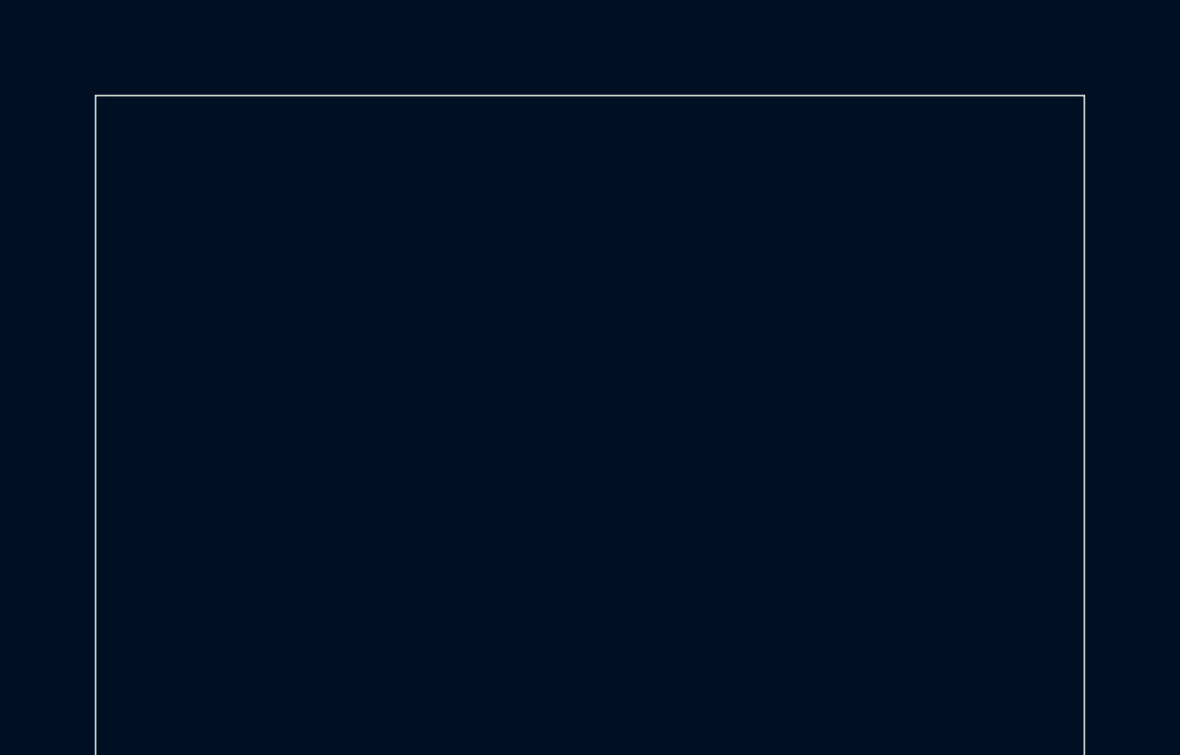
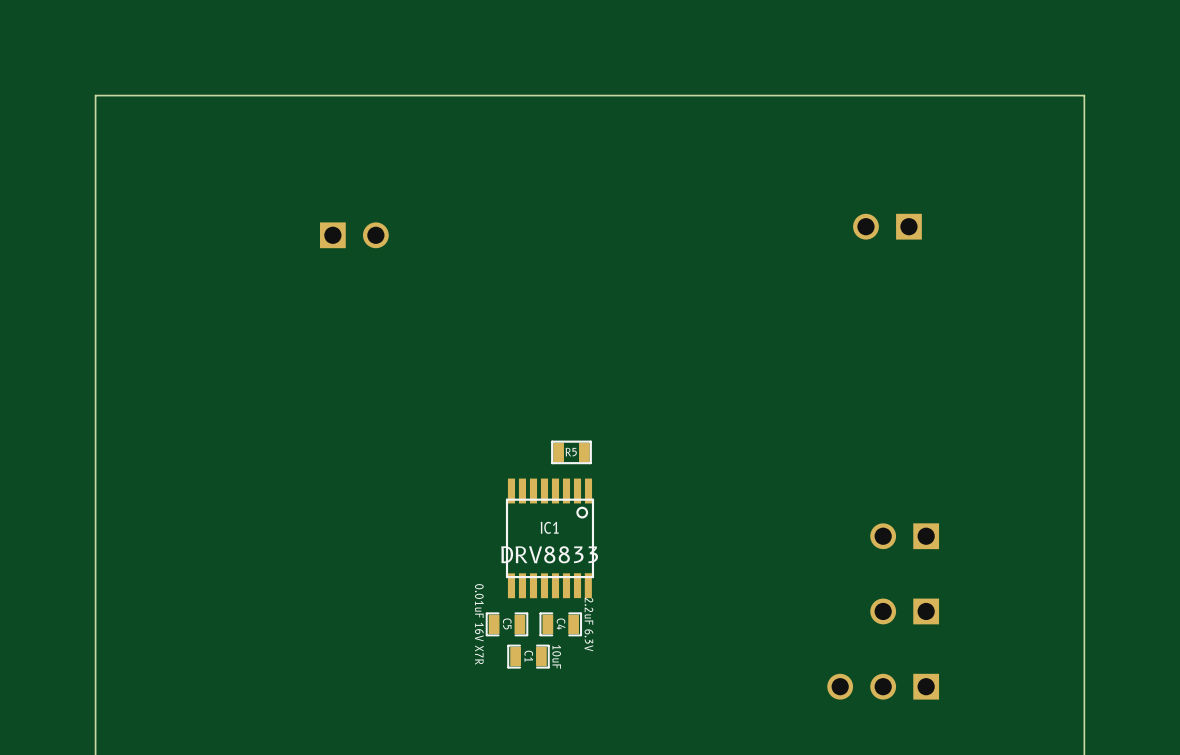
part: none -> (887, 226)
part: none -> (354, 235)
R5: none -> (571, 452)
part: none -> (904, 536)
IC1: none -> DRV8833 (549, 538)
part: none -> (904, 611)
C5: none -> 0.01uF 16V X7R (507, 624)
C4: none -> 2.2uF 6.3V (560, 624)
C1: none -> 10uF (528, 656)
part: none -> (883, 686)

